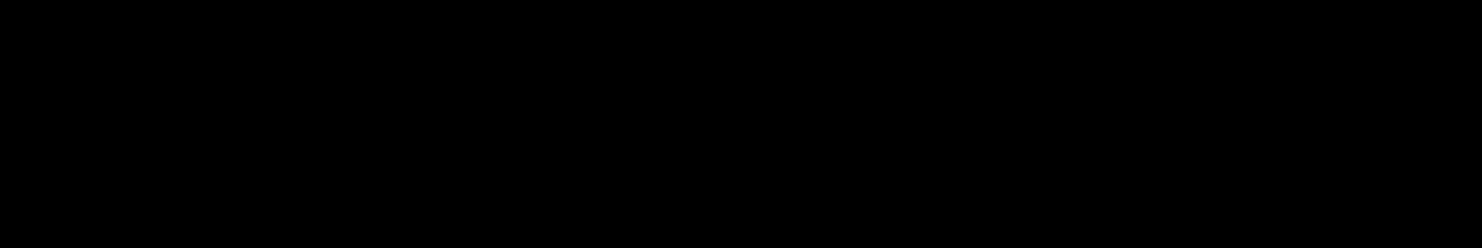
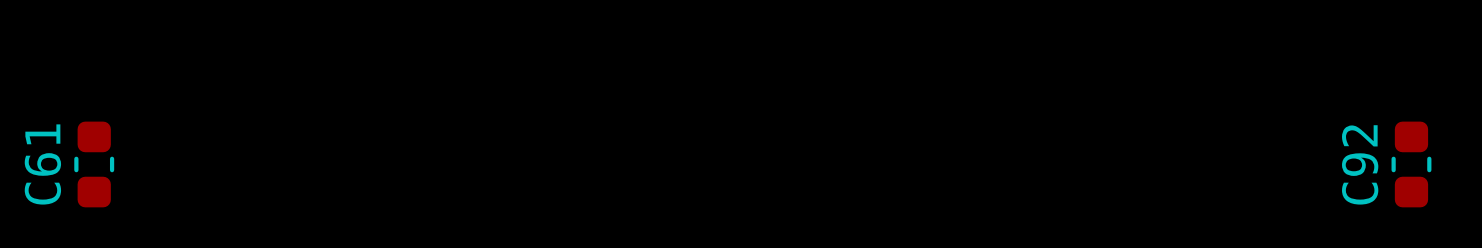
C61: none -> (94, 164)
C92: none -> (1411, 164)

